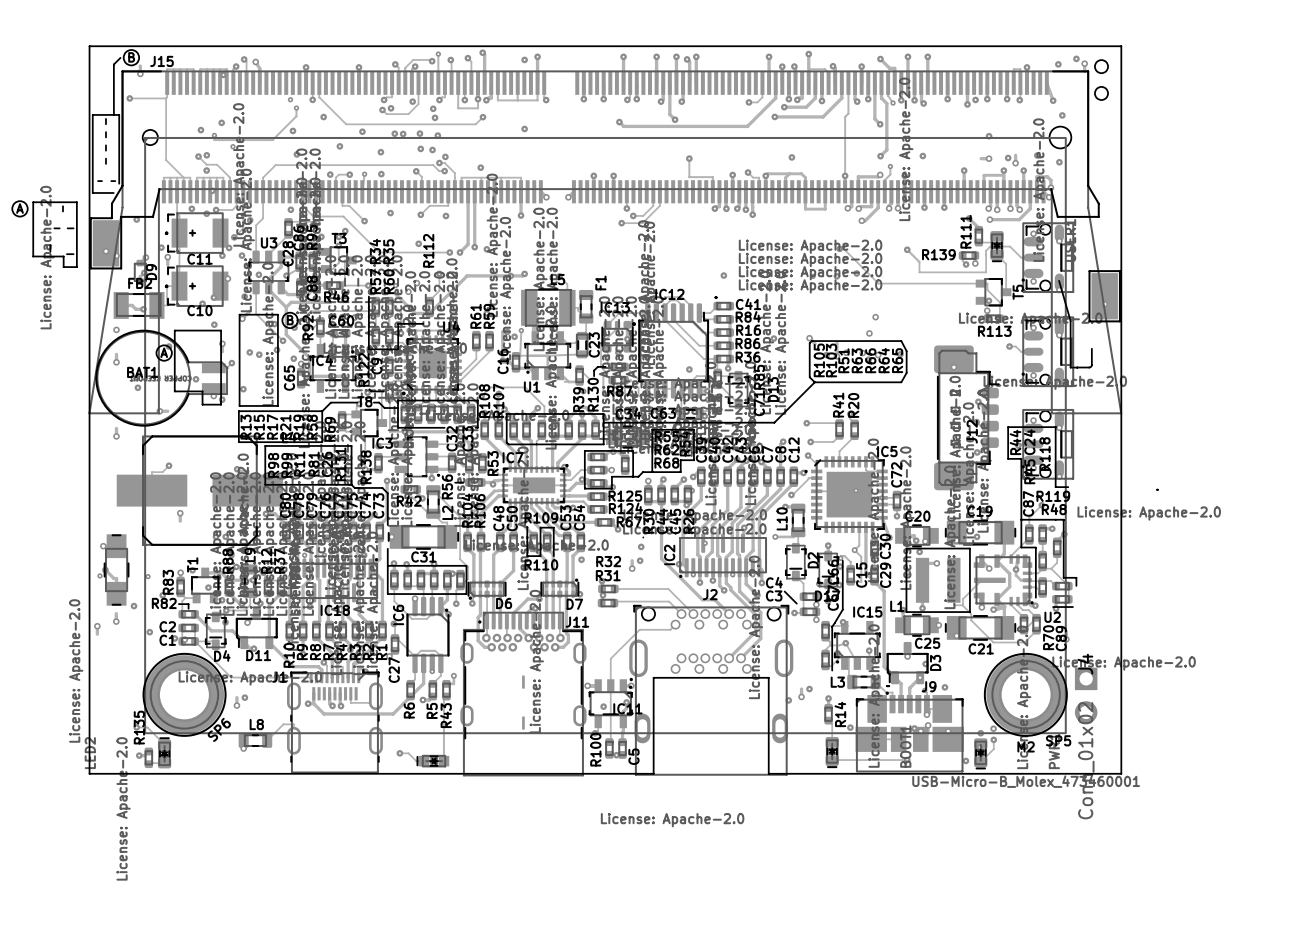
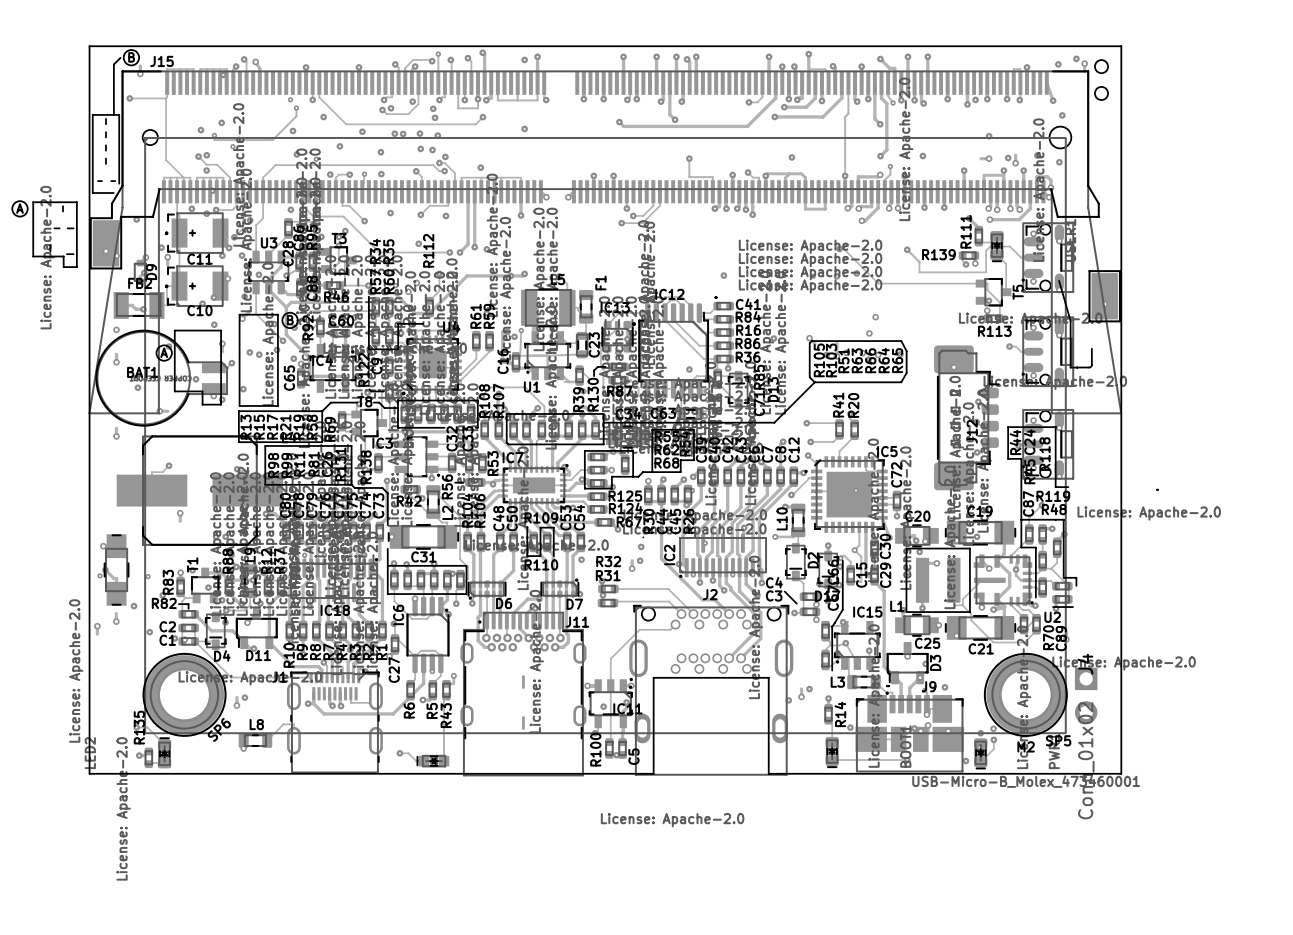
via: none -> (316, 159)

